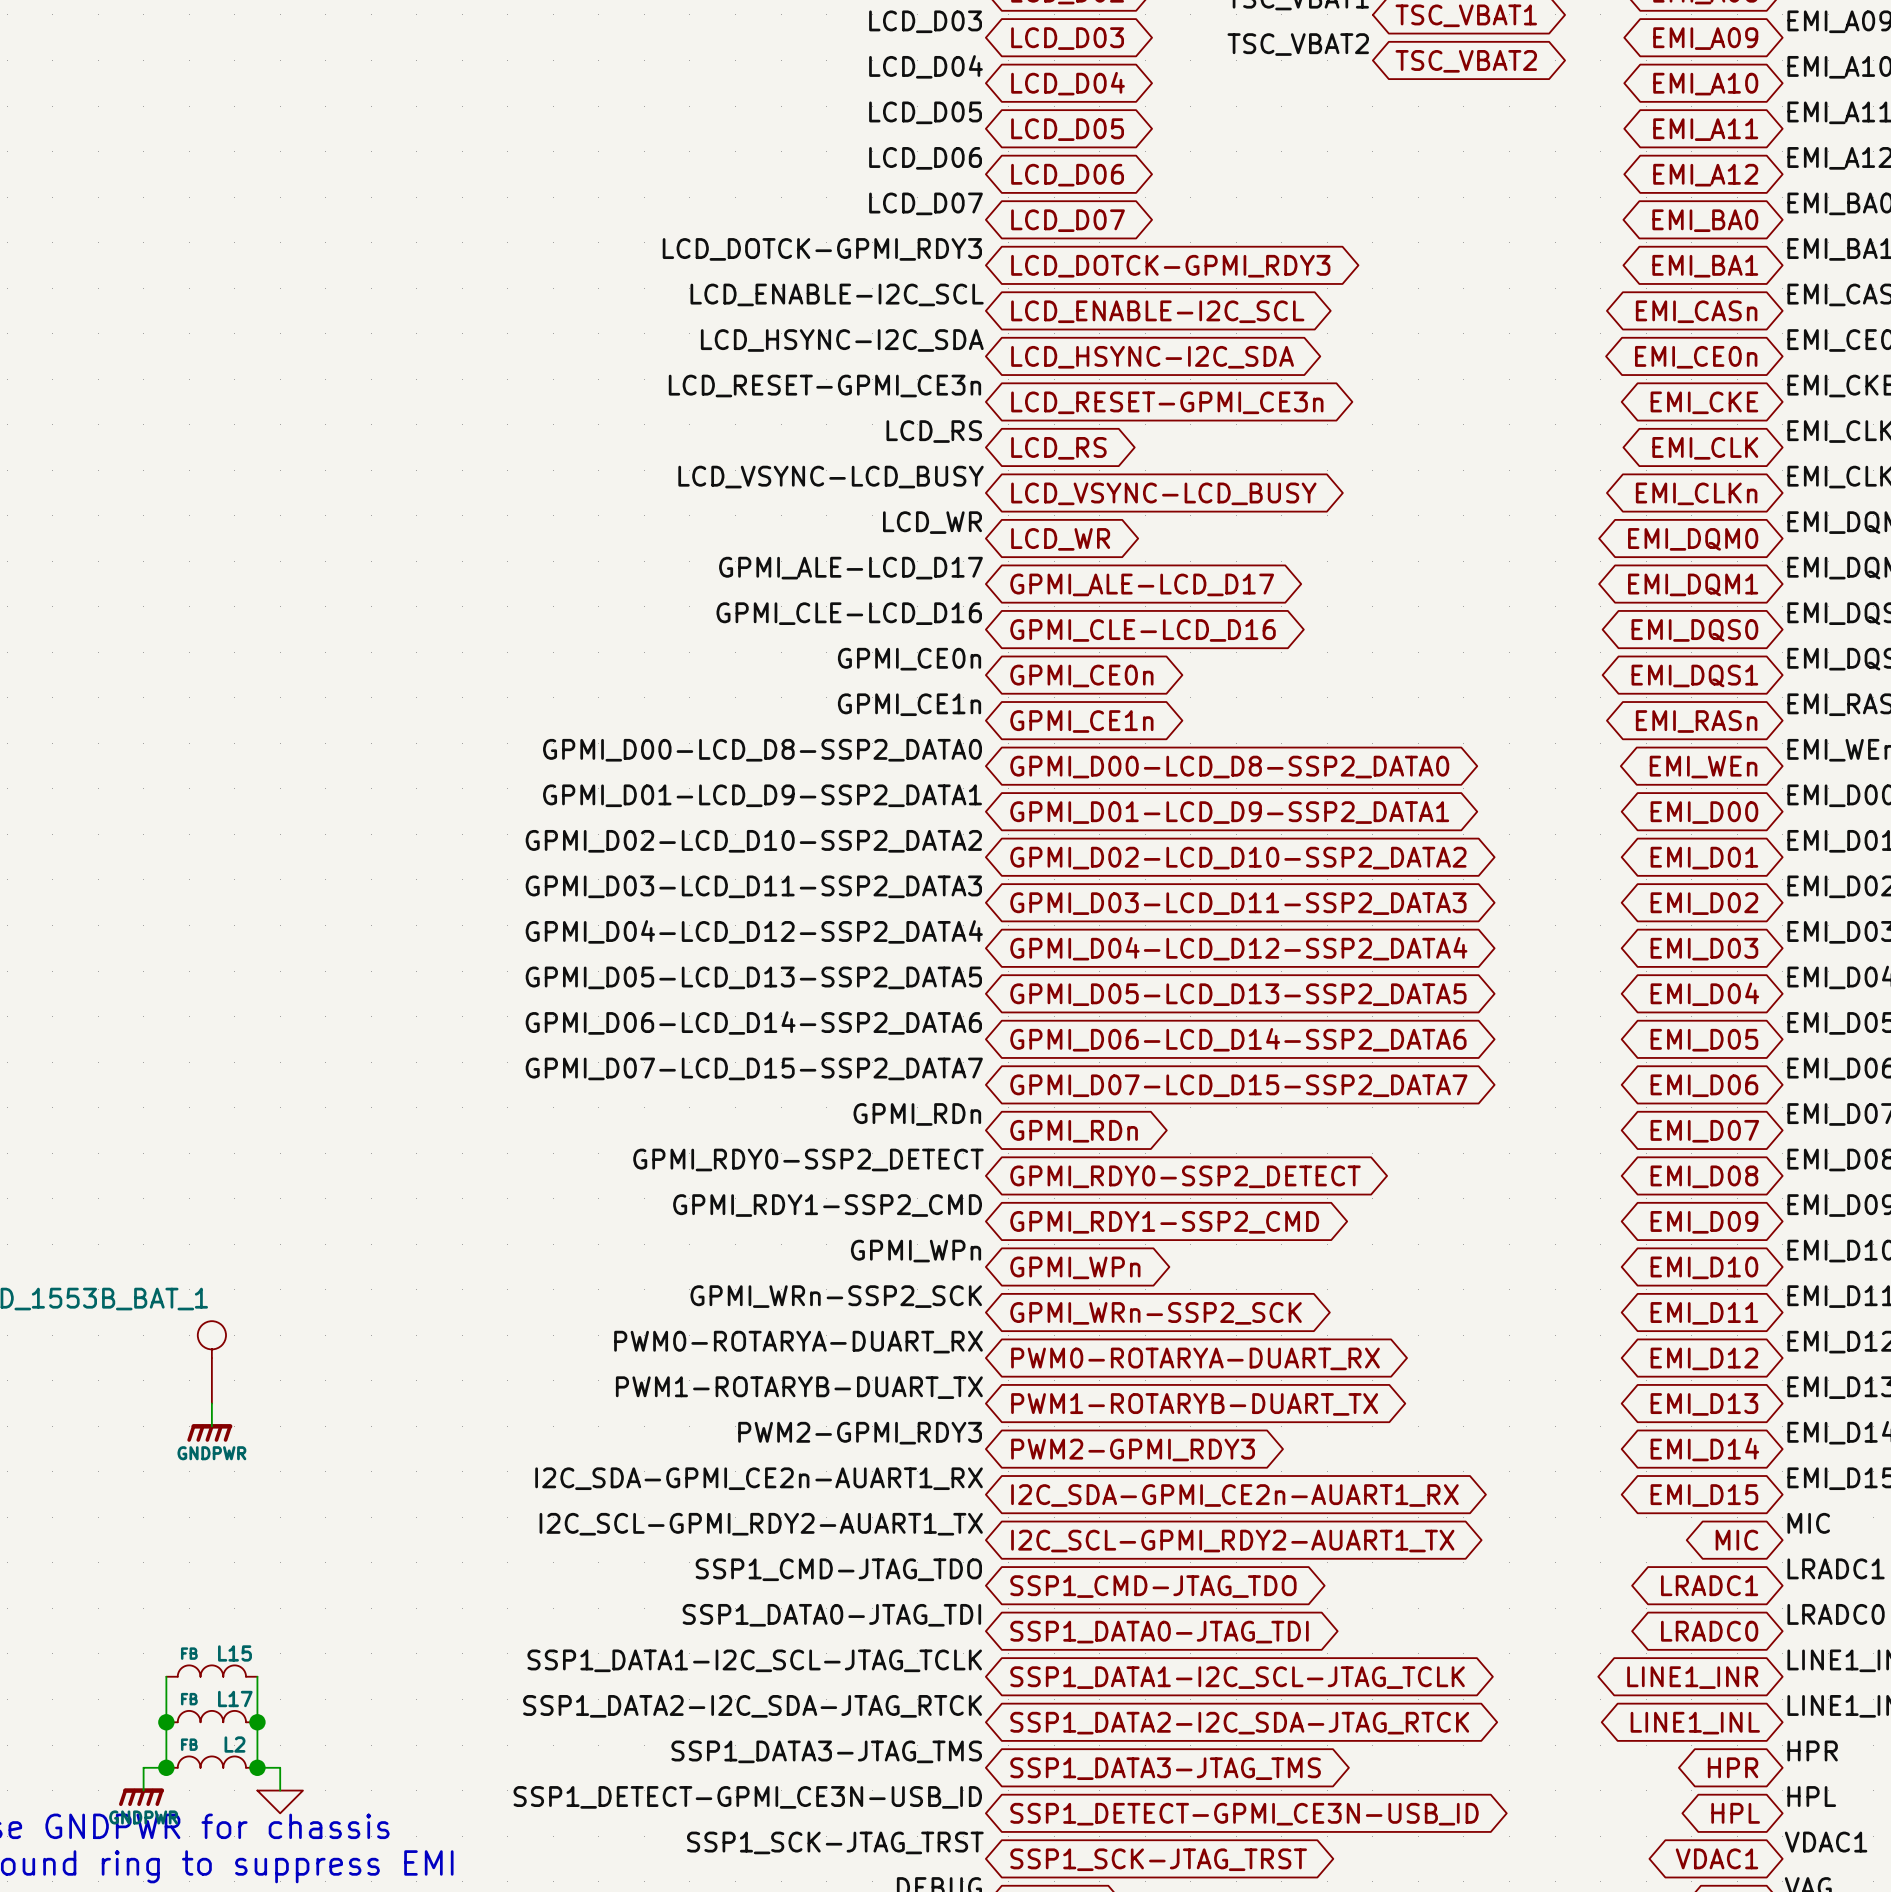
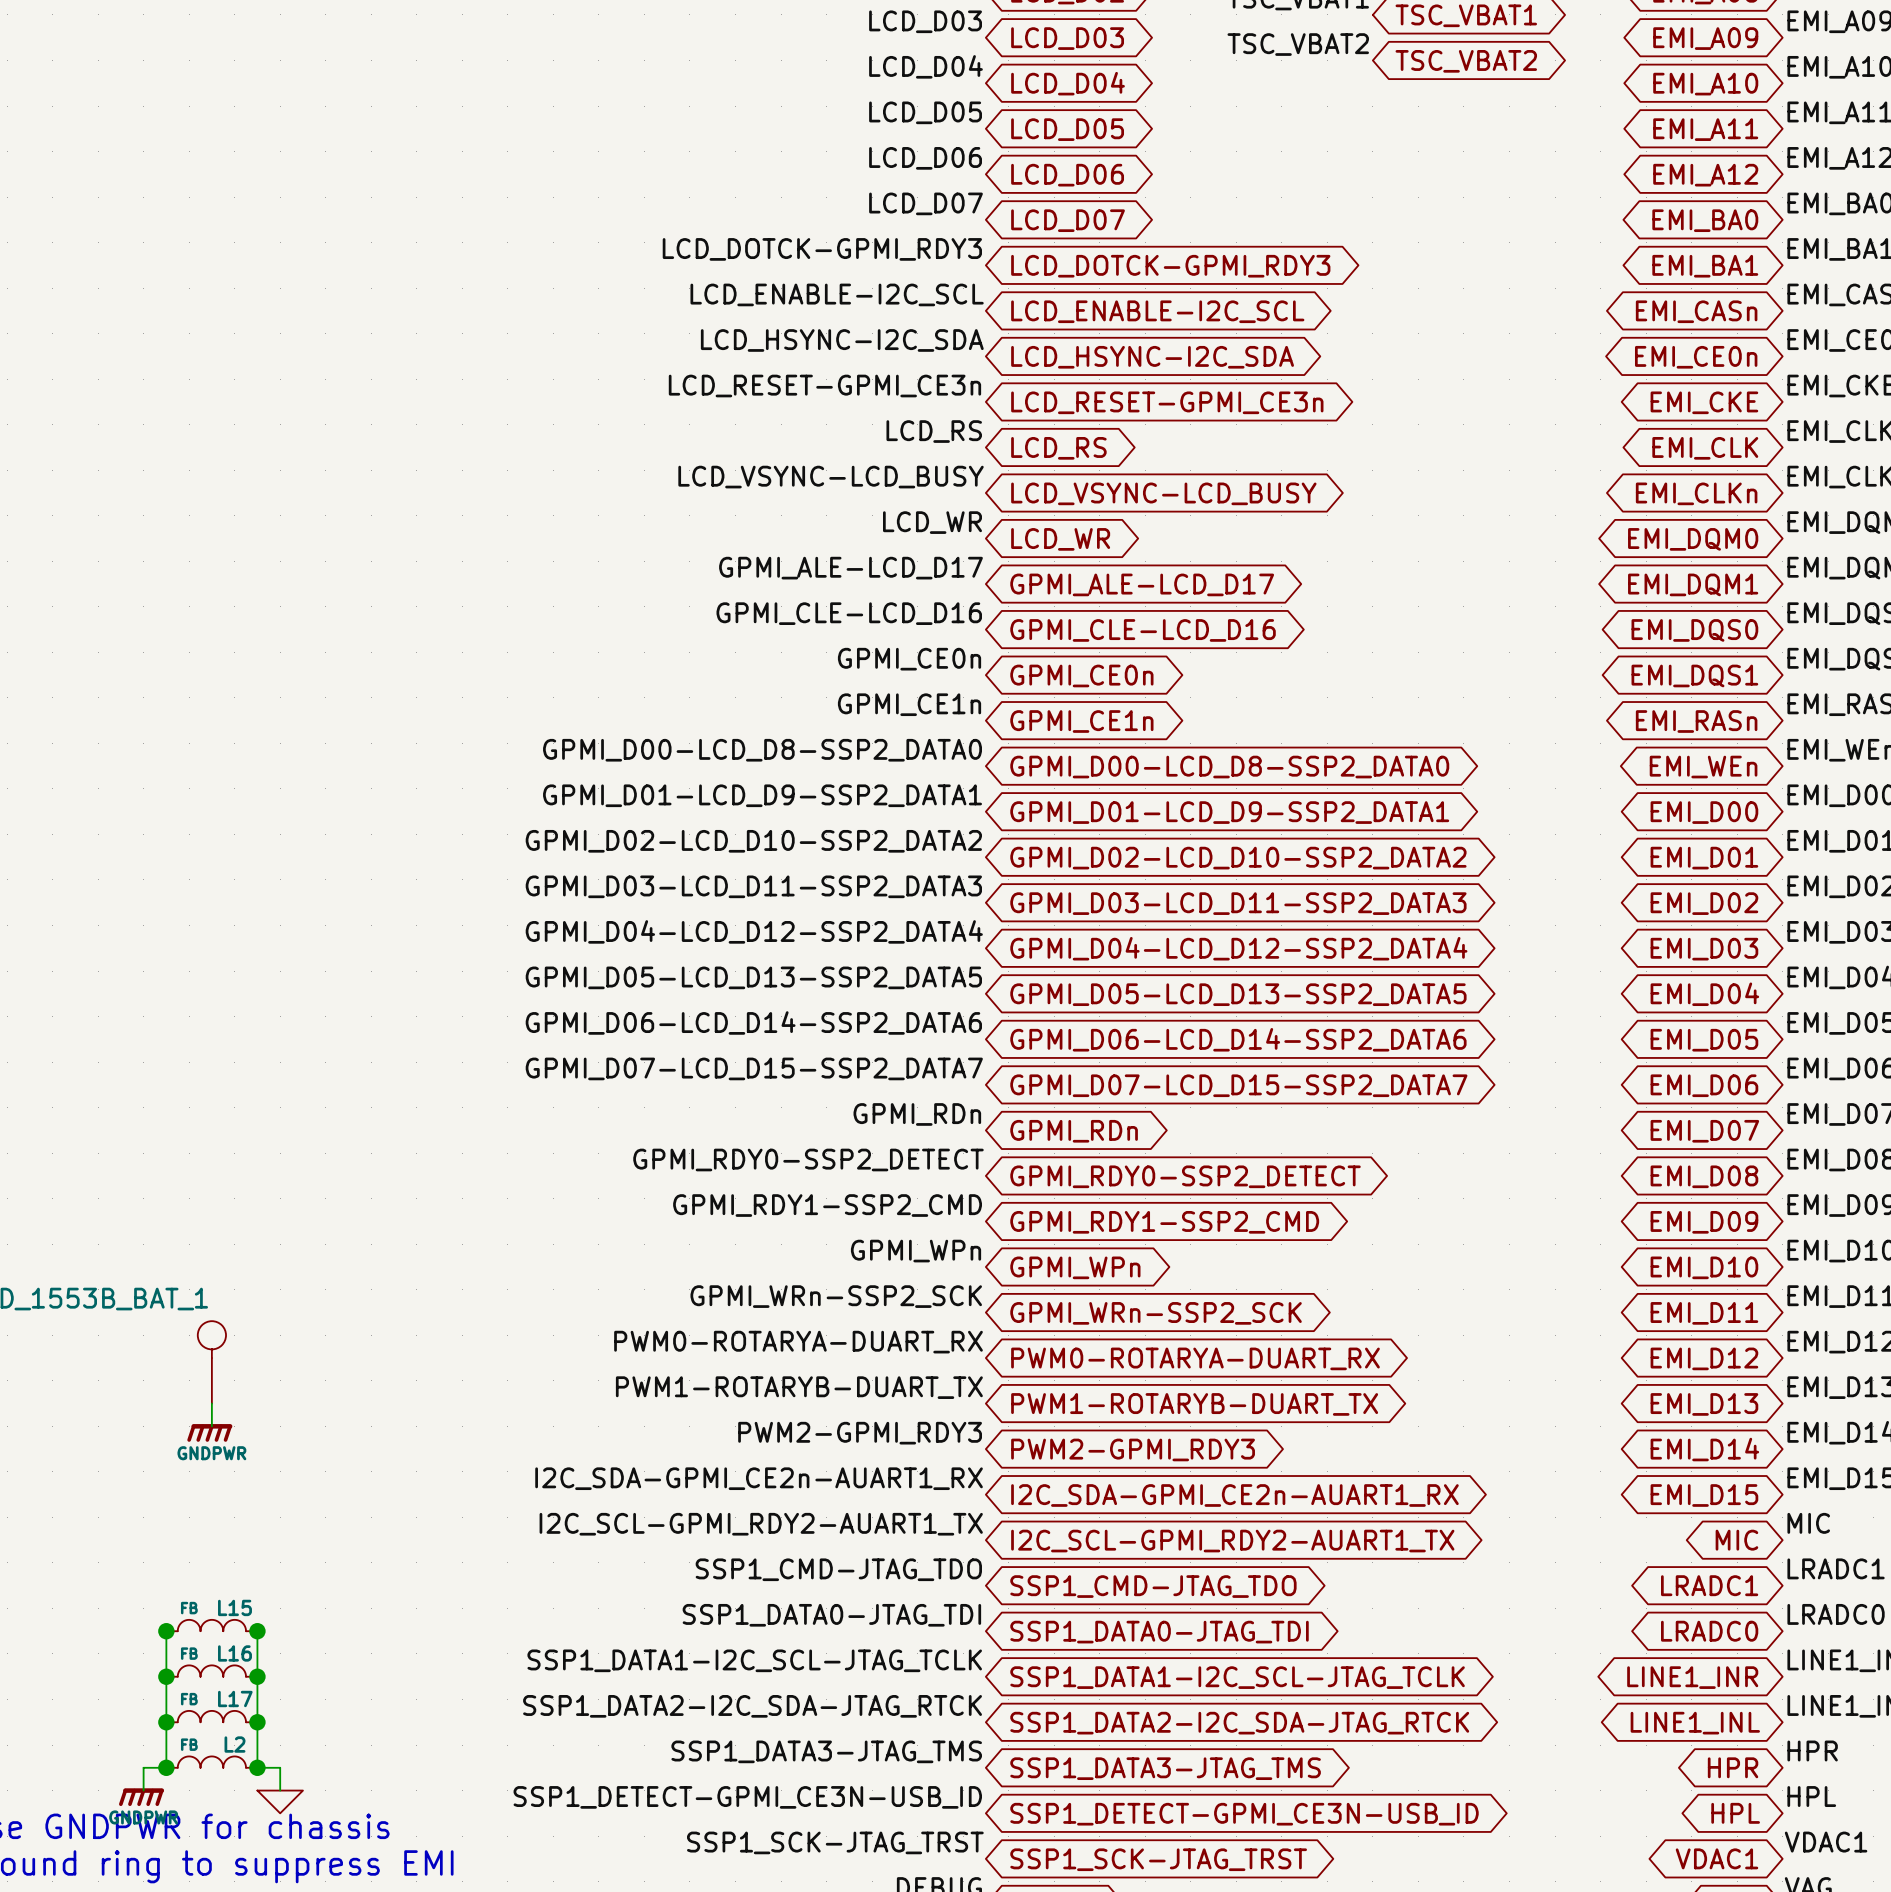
L15: none -> FB (211, 1625)
wire: none -> (166, 1631) (166, 1676)
junction: none -> (166, 1631)
wire: none -> (257, 1631) (257, 1676)
junction: none -> (257, 1631)
L15 name: L15 (234, 1653) -> L16 (234, 1653)
junction: none -> (166, 1676)
junction: none -> (257, 1676)

